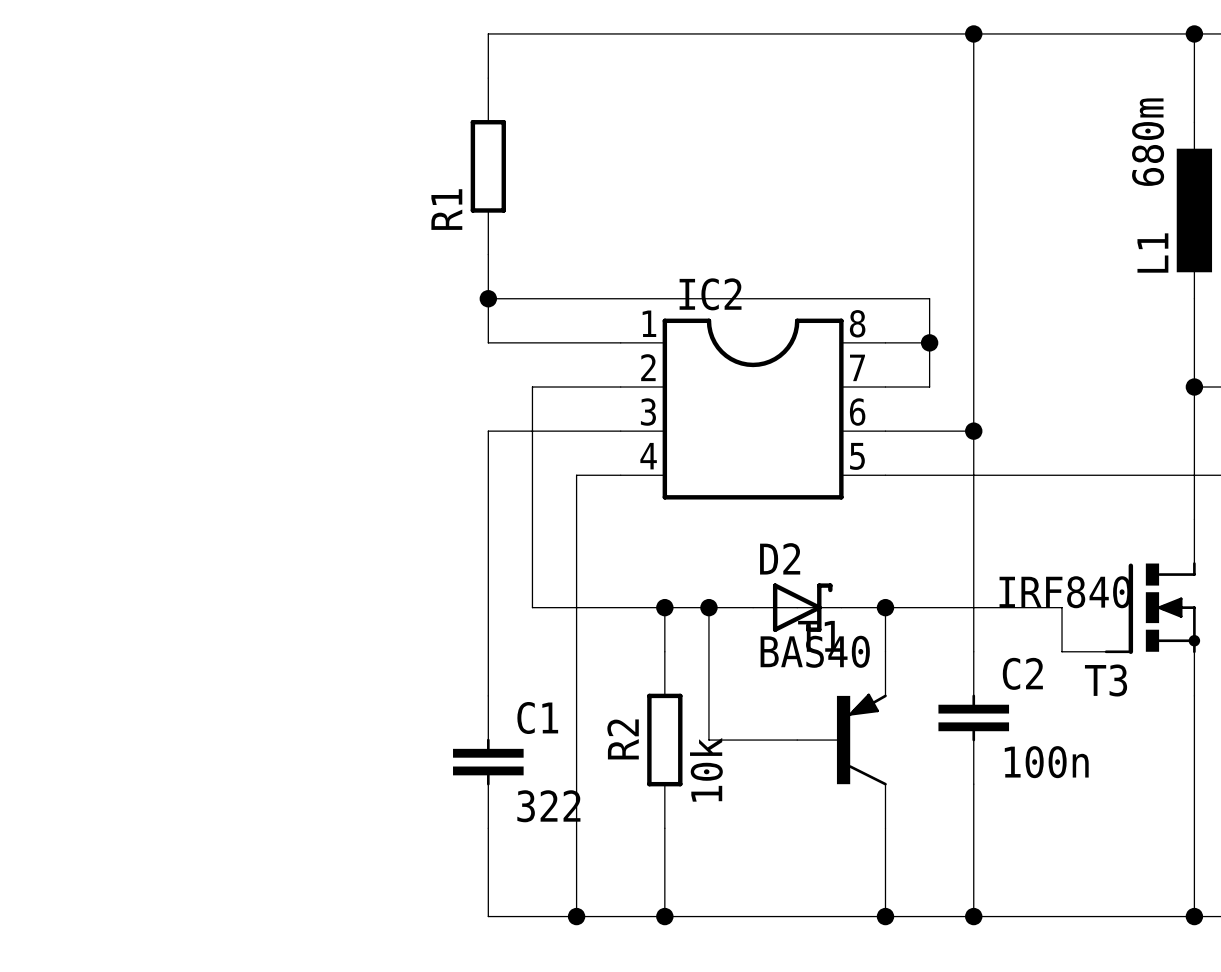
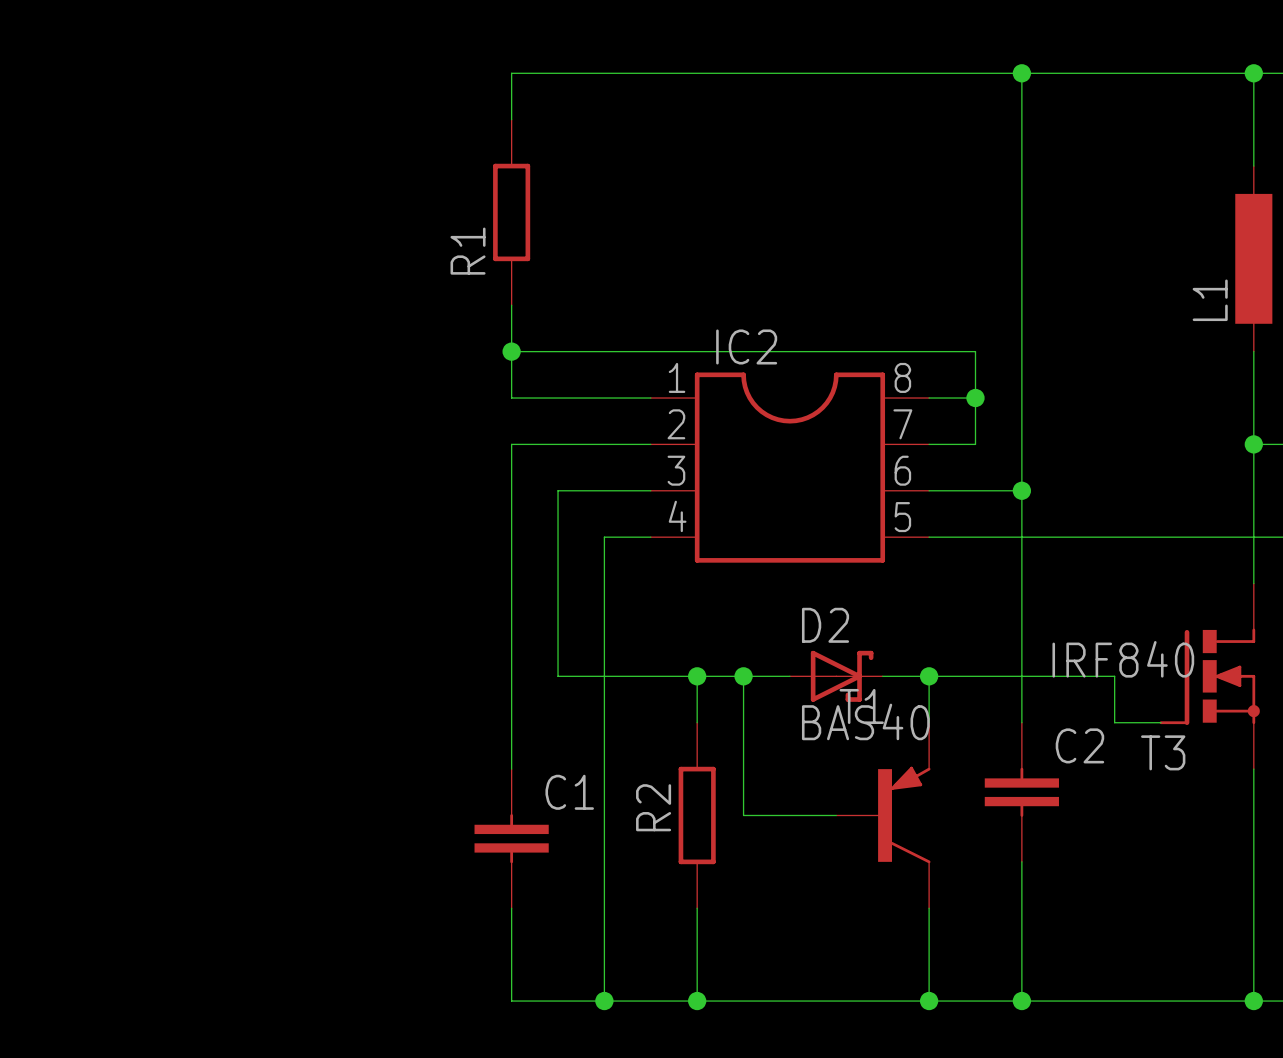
L1 value: 680m (1148, 142) -> none
wire: (532, 387) (532, 431) (488, 431) -> (558, 444) (511, 444) (511, 490)
C2 value: 100n (1046, 762) -> none
R2 value: 10k (706, 769) -> none
C1 value: 322 (548, 806) -> none

